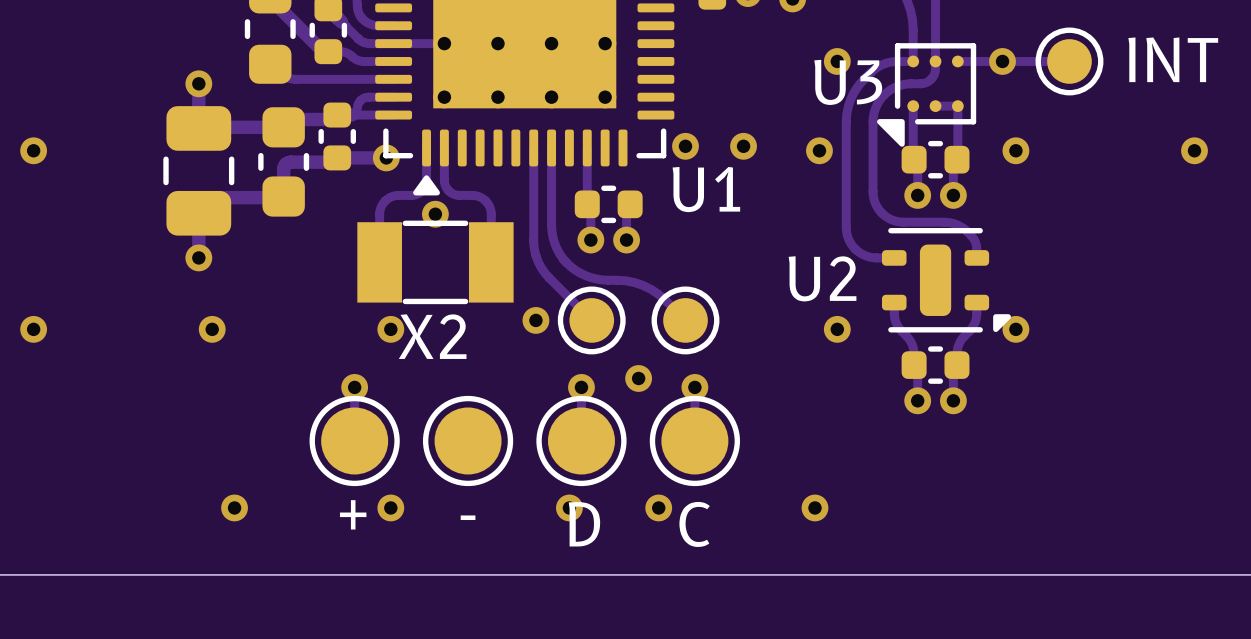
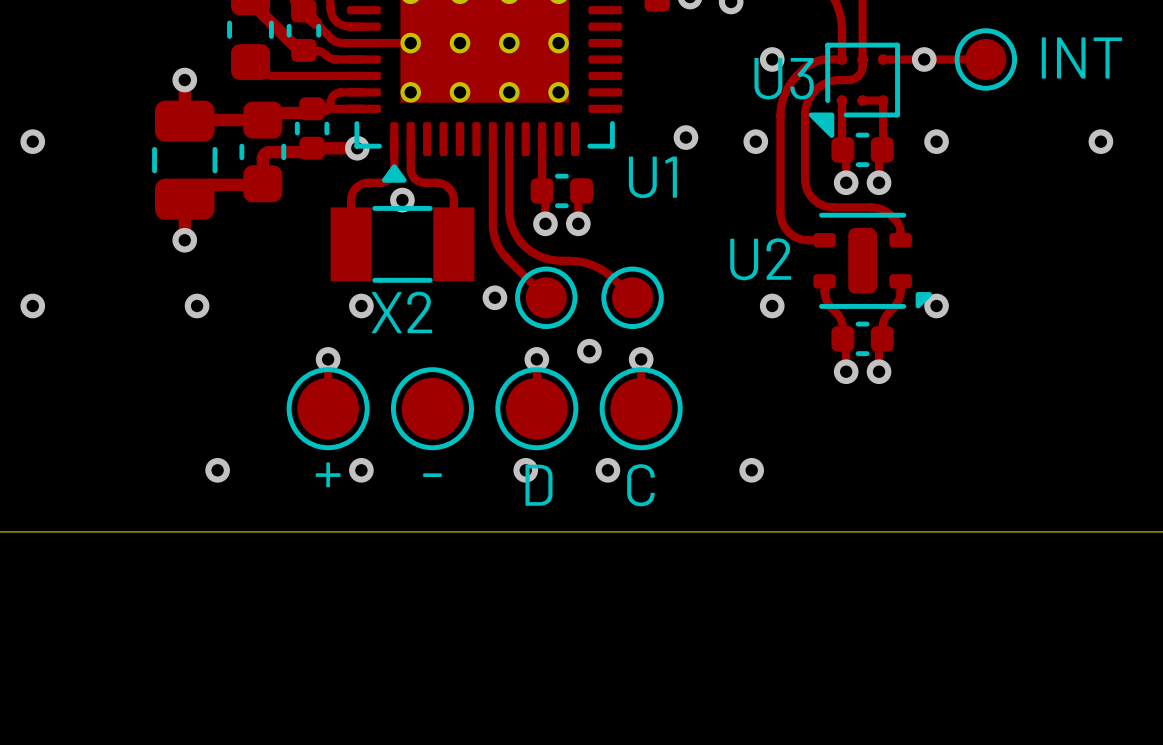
via: (685, 146) -> none

